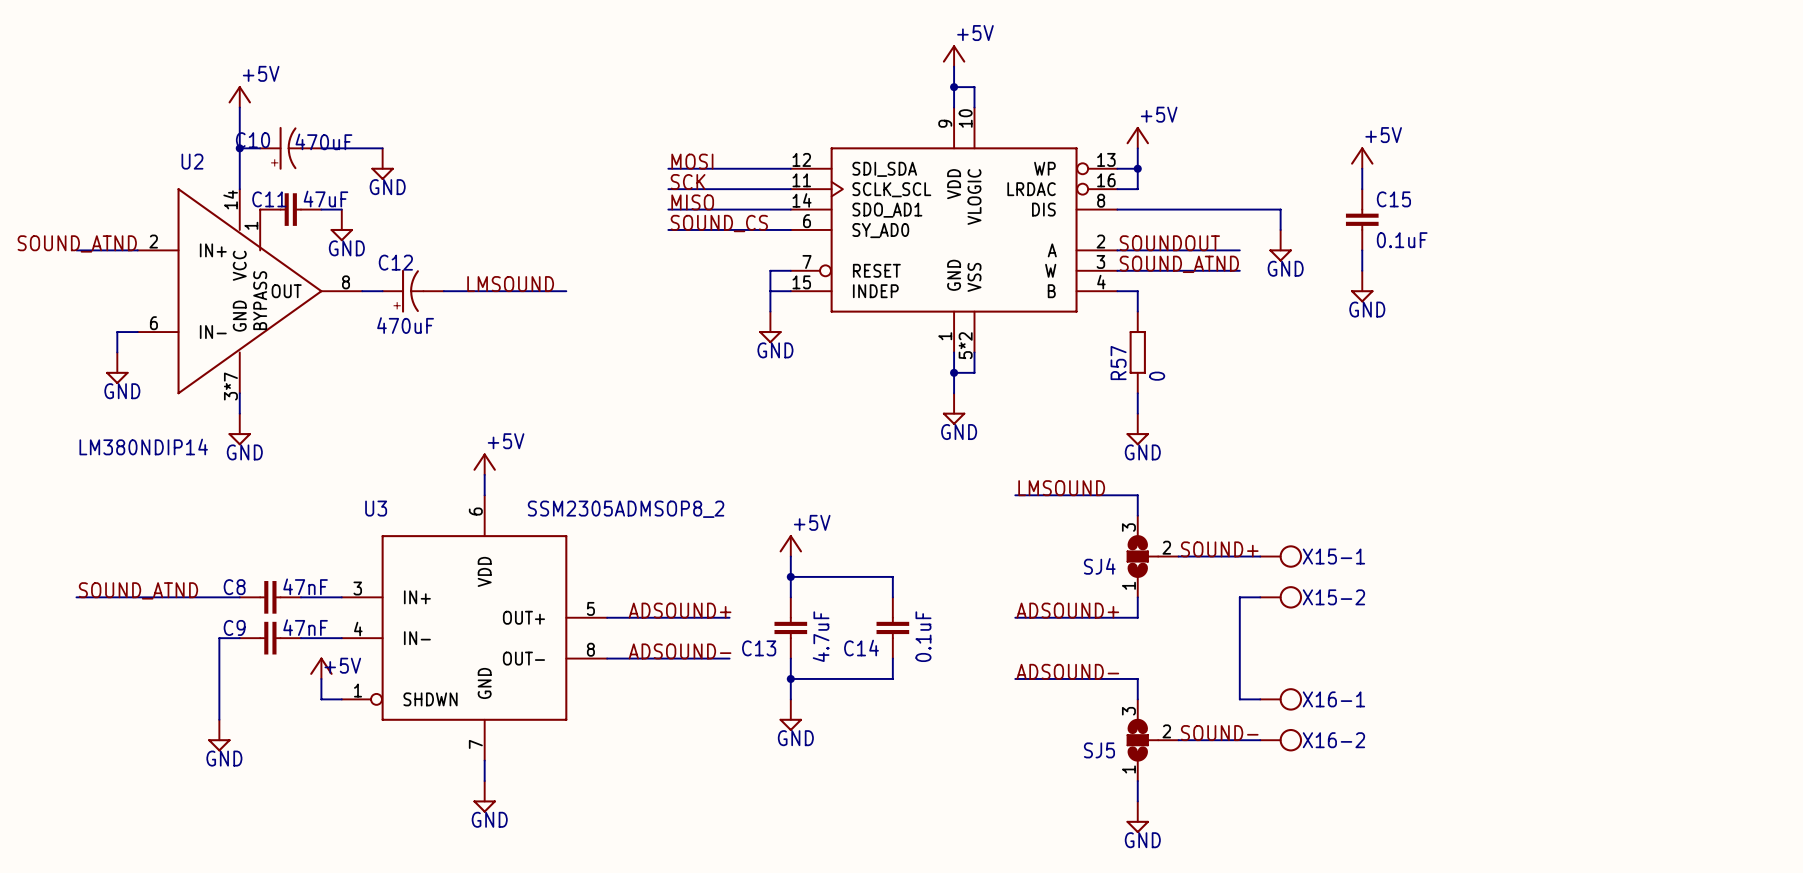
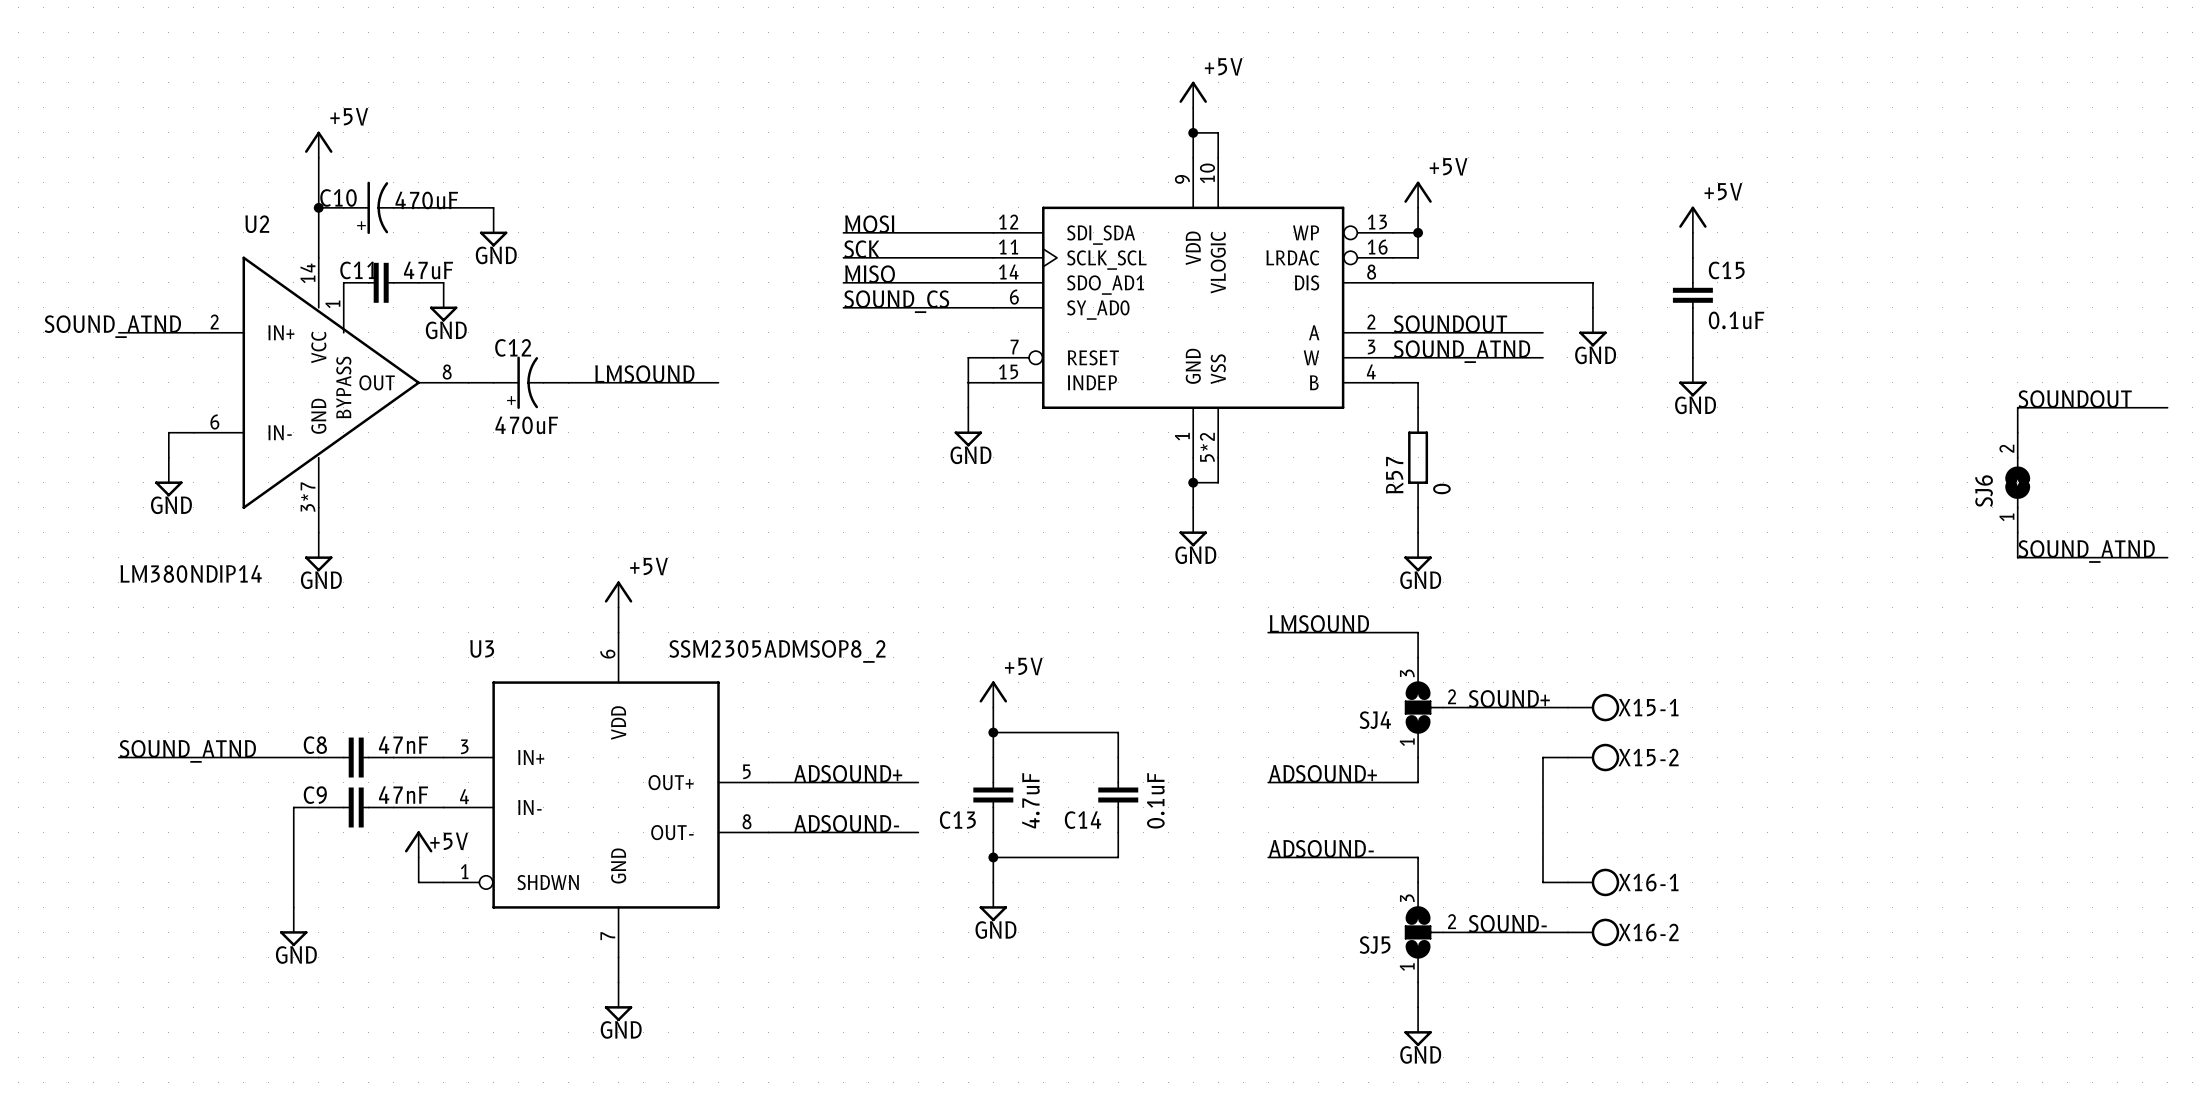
label: none -> SOUNDOUT (2075, 399)
wire: none -> (2167, 407) (2017, 407) (2017, 432)
SJ6: none -> (2017, 482)
wire: none -> (2017, 532) (2017, 557) (2167, 557)
label: none -> SOUND_ATND (2086, 551)

